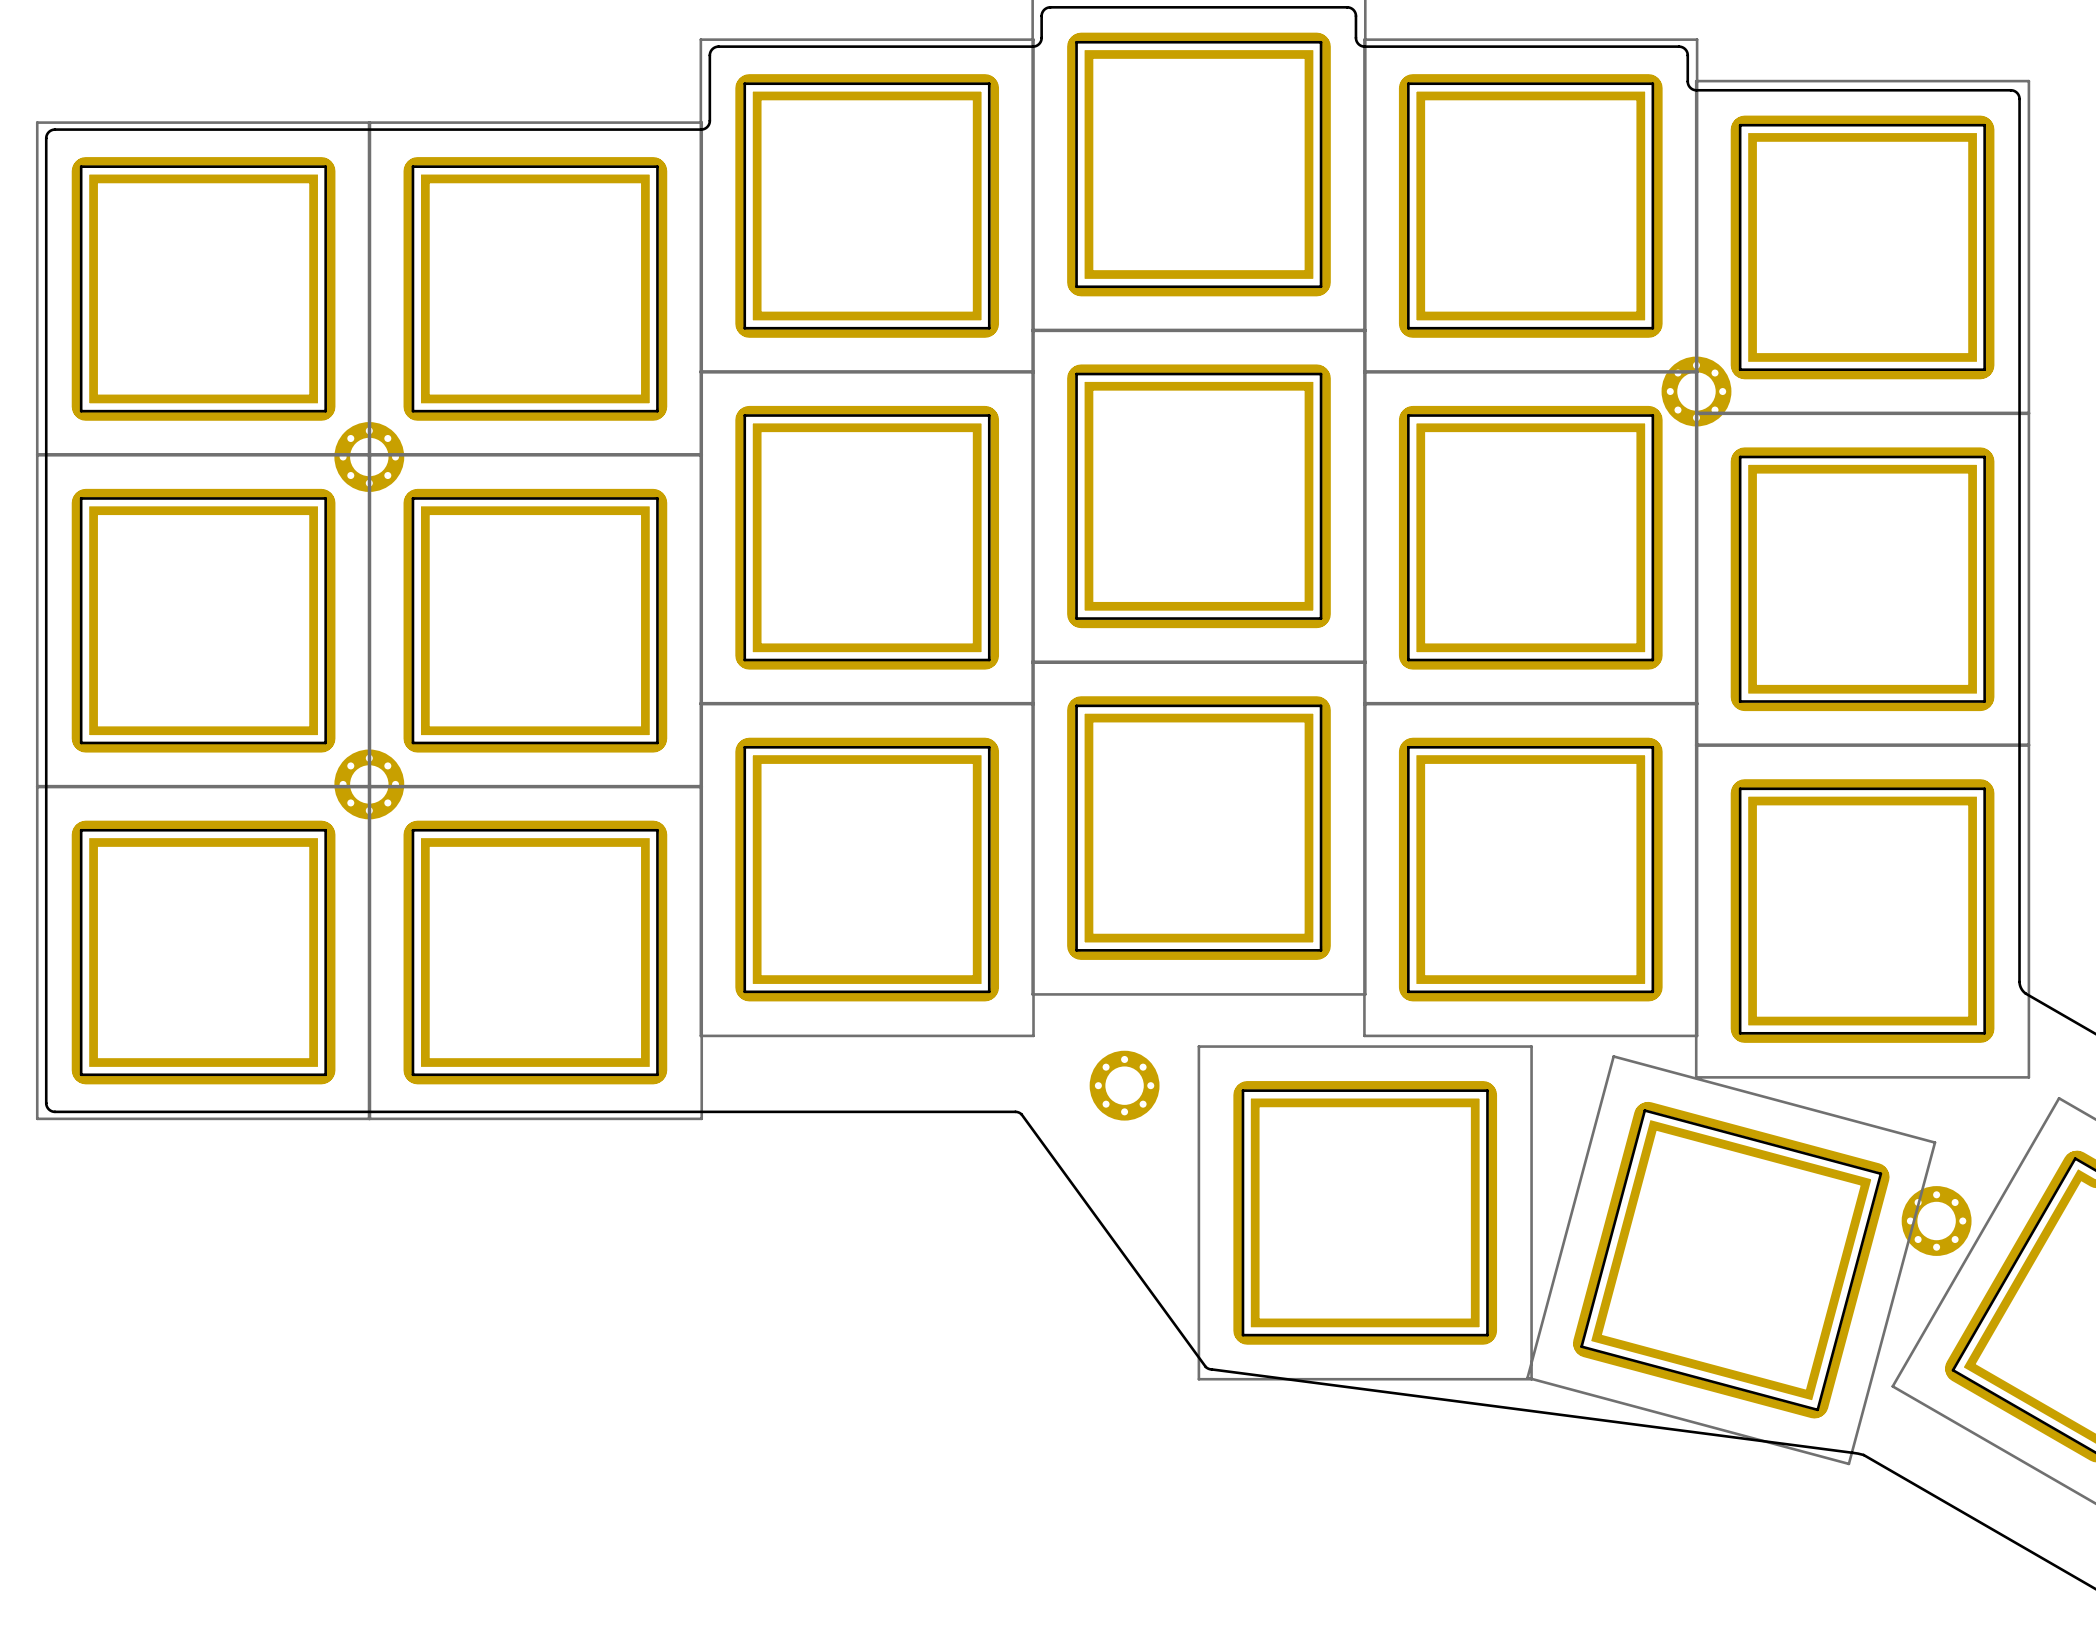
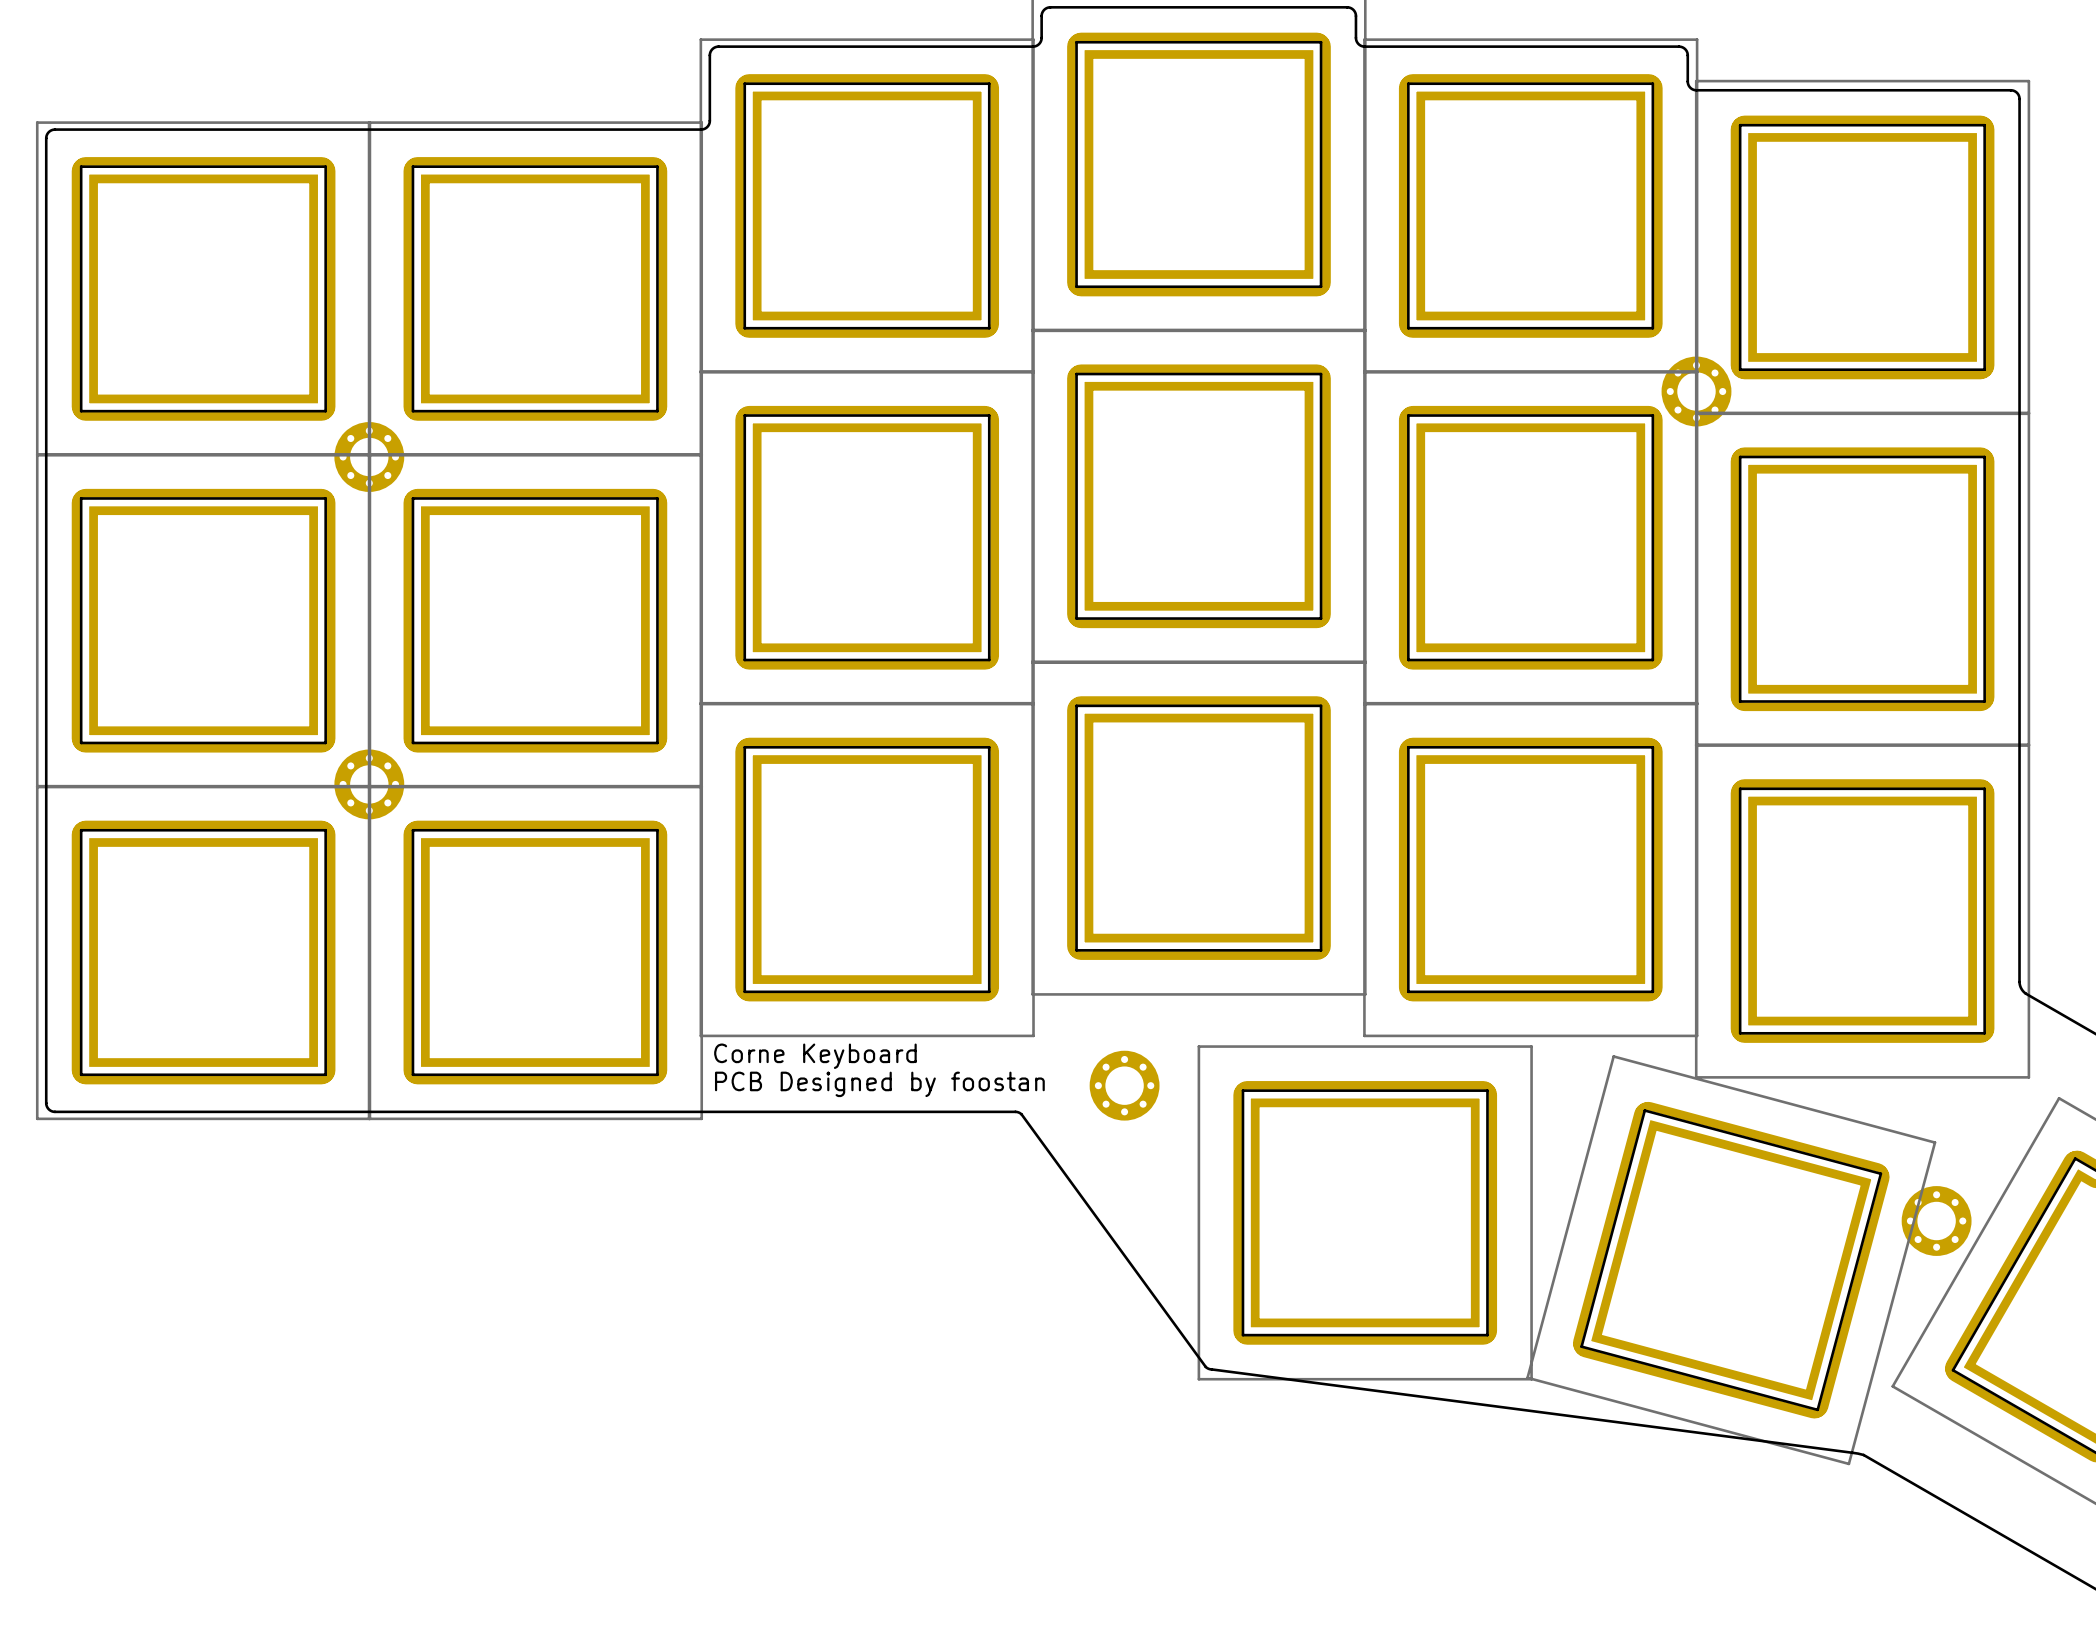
text: none -> Corne Keyboard (815, 1056)
text: none -> PCB Designed by foostan (879, 1084)

